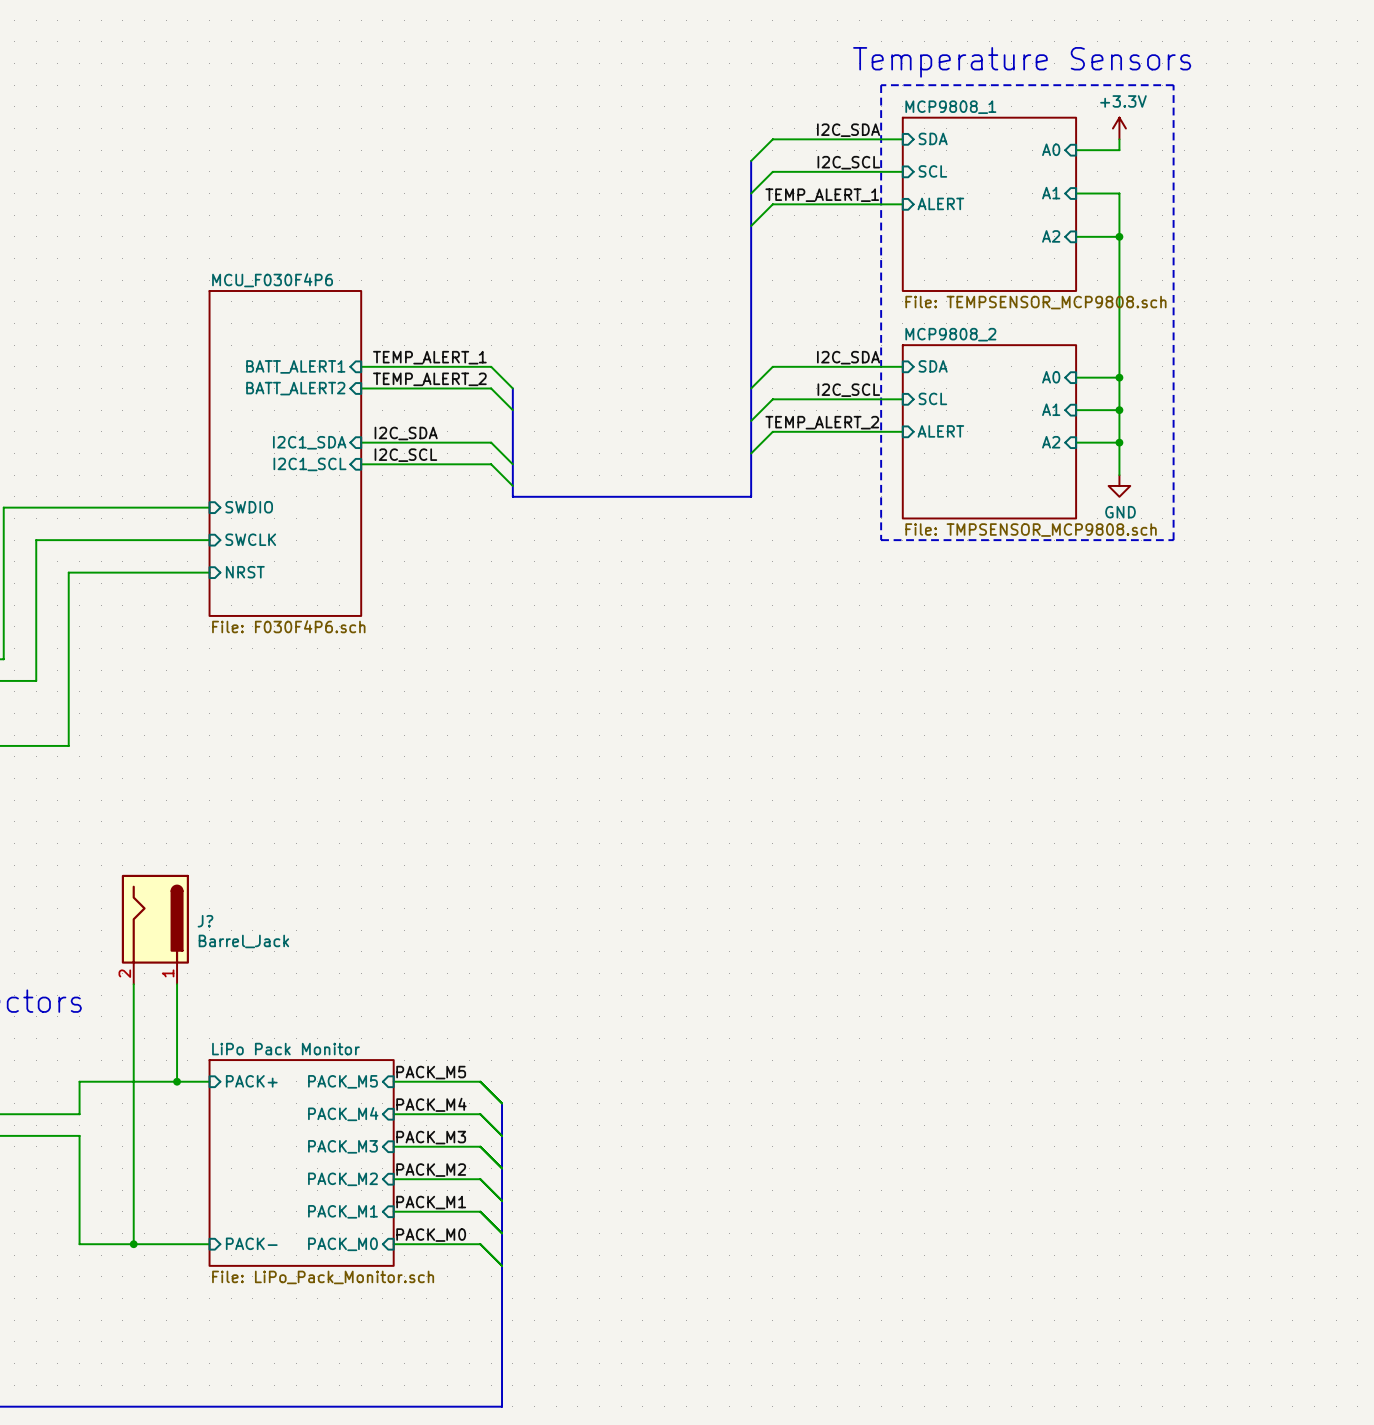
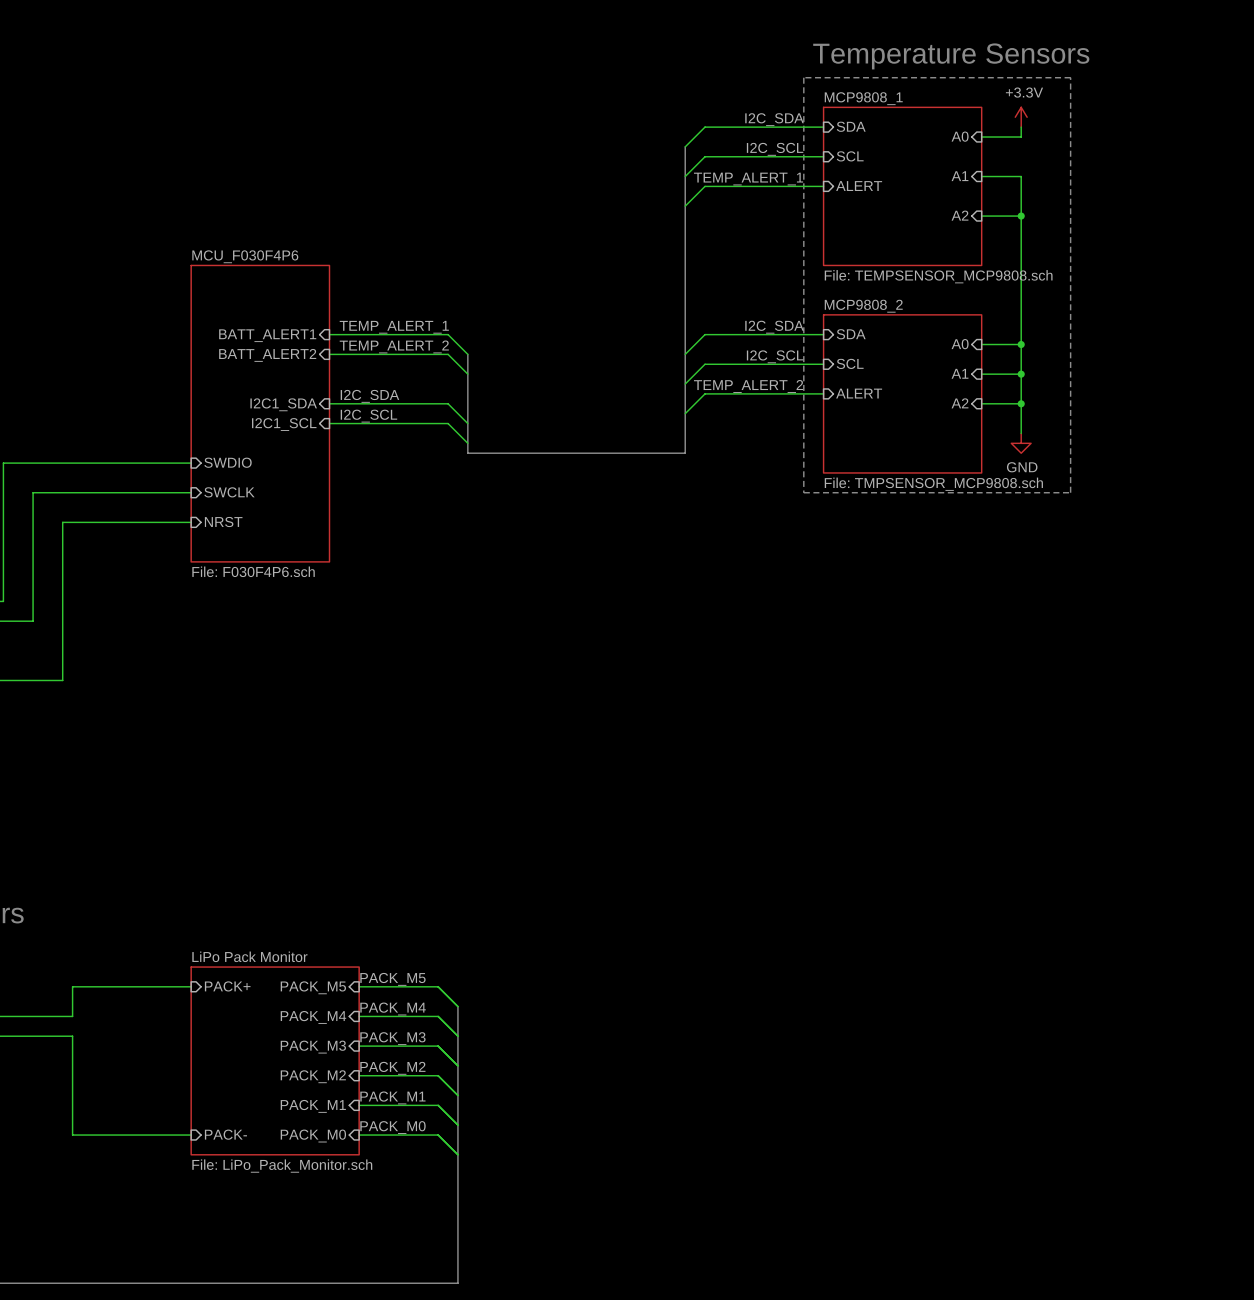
J?: Barrel_Jack (155, 929) -> none
wire: (133, 984) (133, 1244) -> none
wire: (177, 984) (177, 1081) -> none
junction: (177, 1081) -> none
junction: (133, 1244) -> none

